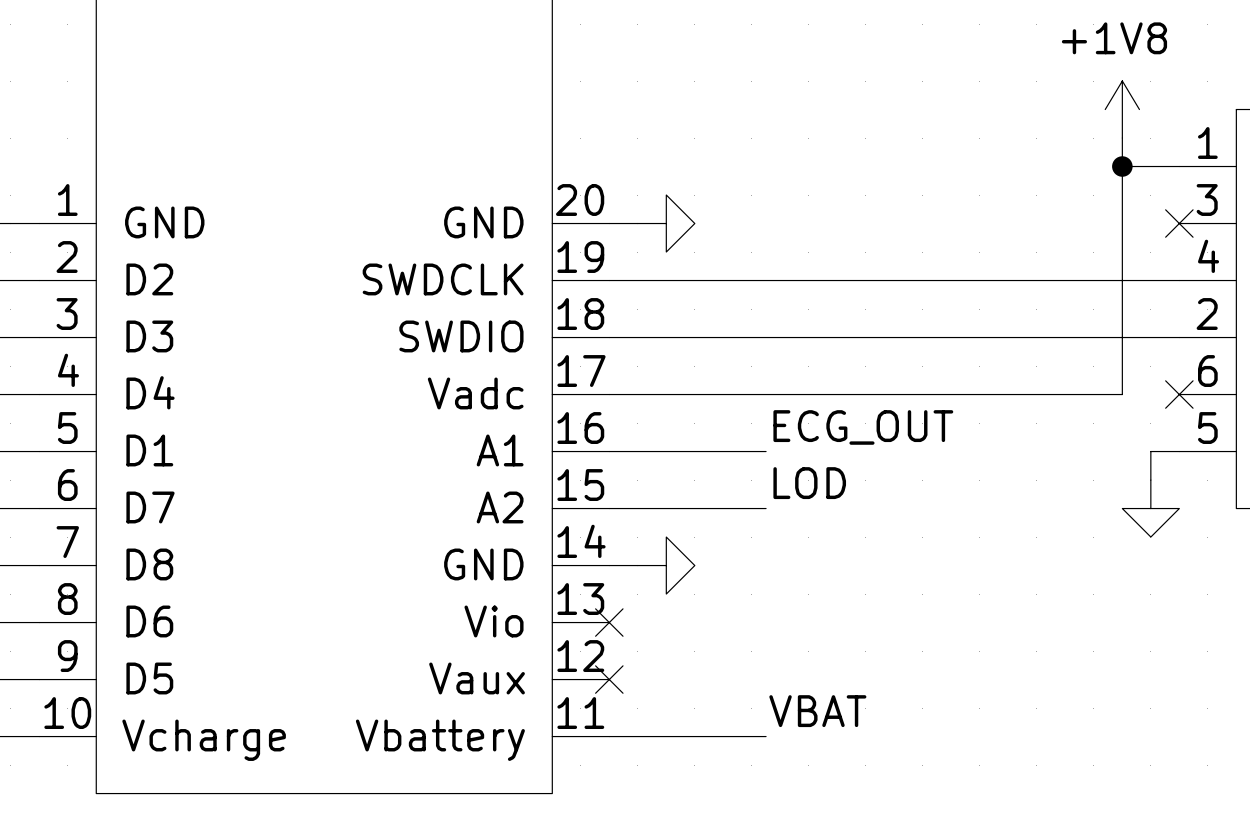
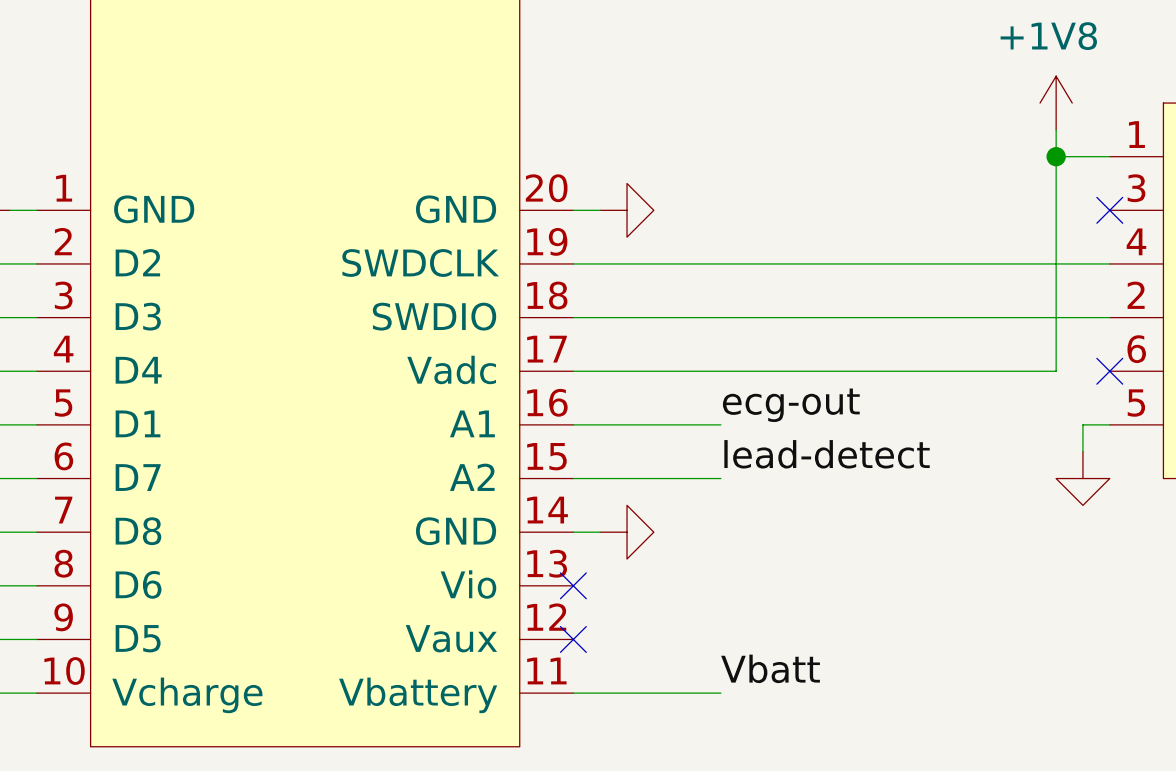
label: ECG_OUT (863, 427) -> ecg-out (791, 405)
label: LOD (809, 483) -> lead-detect (827, 454)
label: VBAT (817, 711) -> Vbatt (770, 668)

